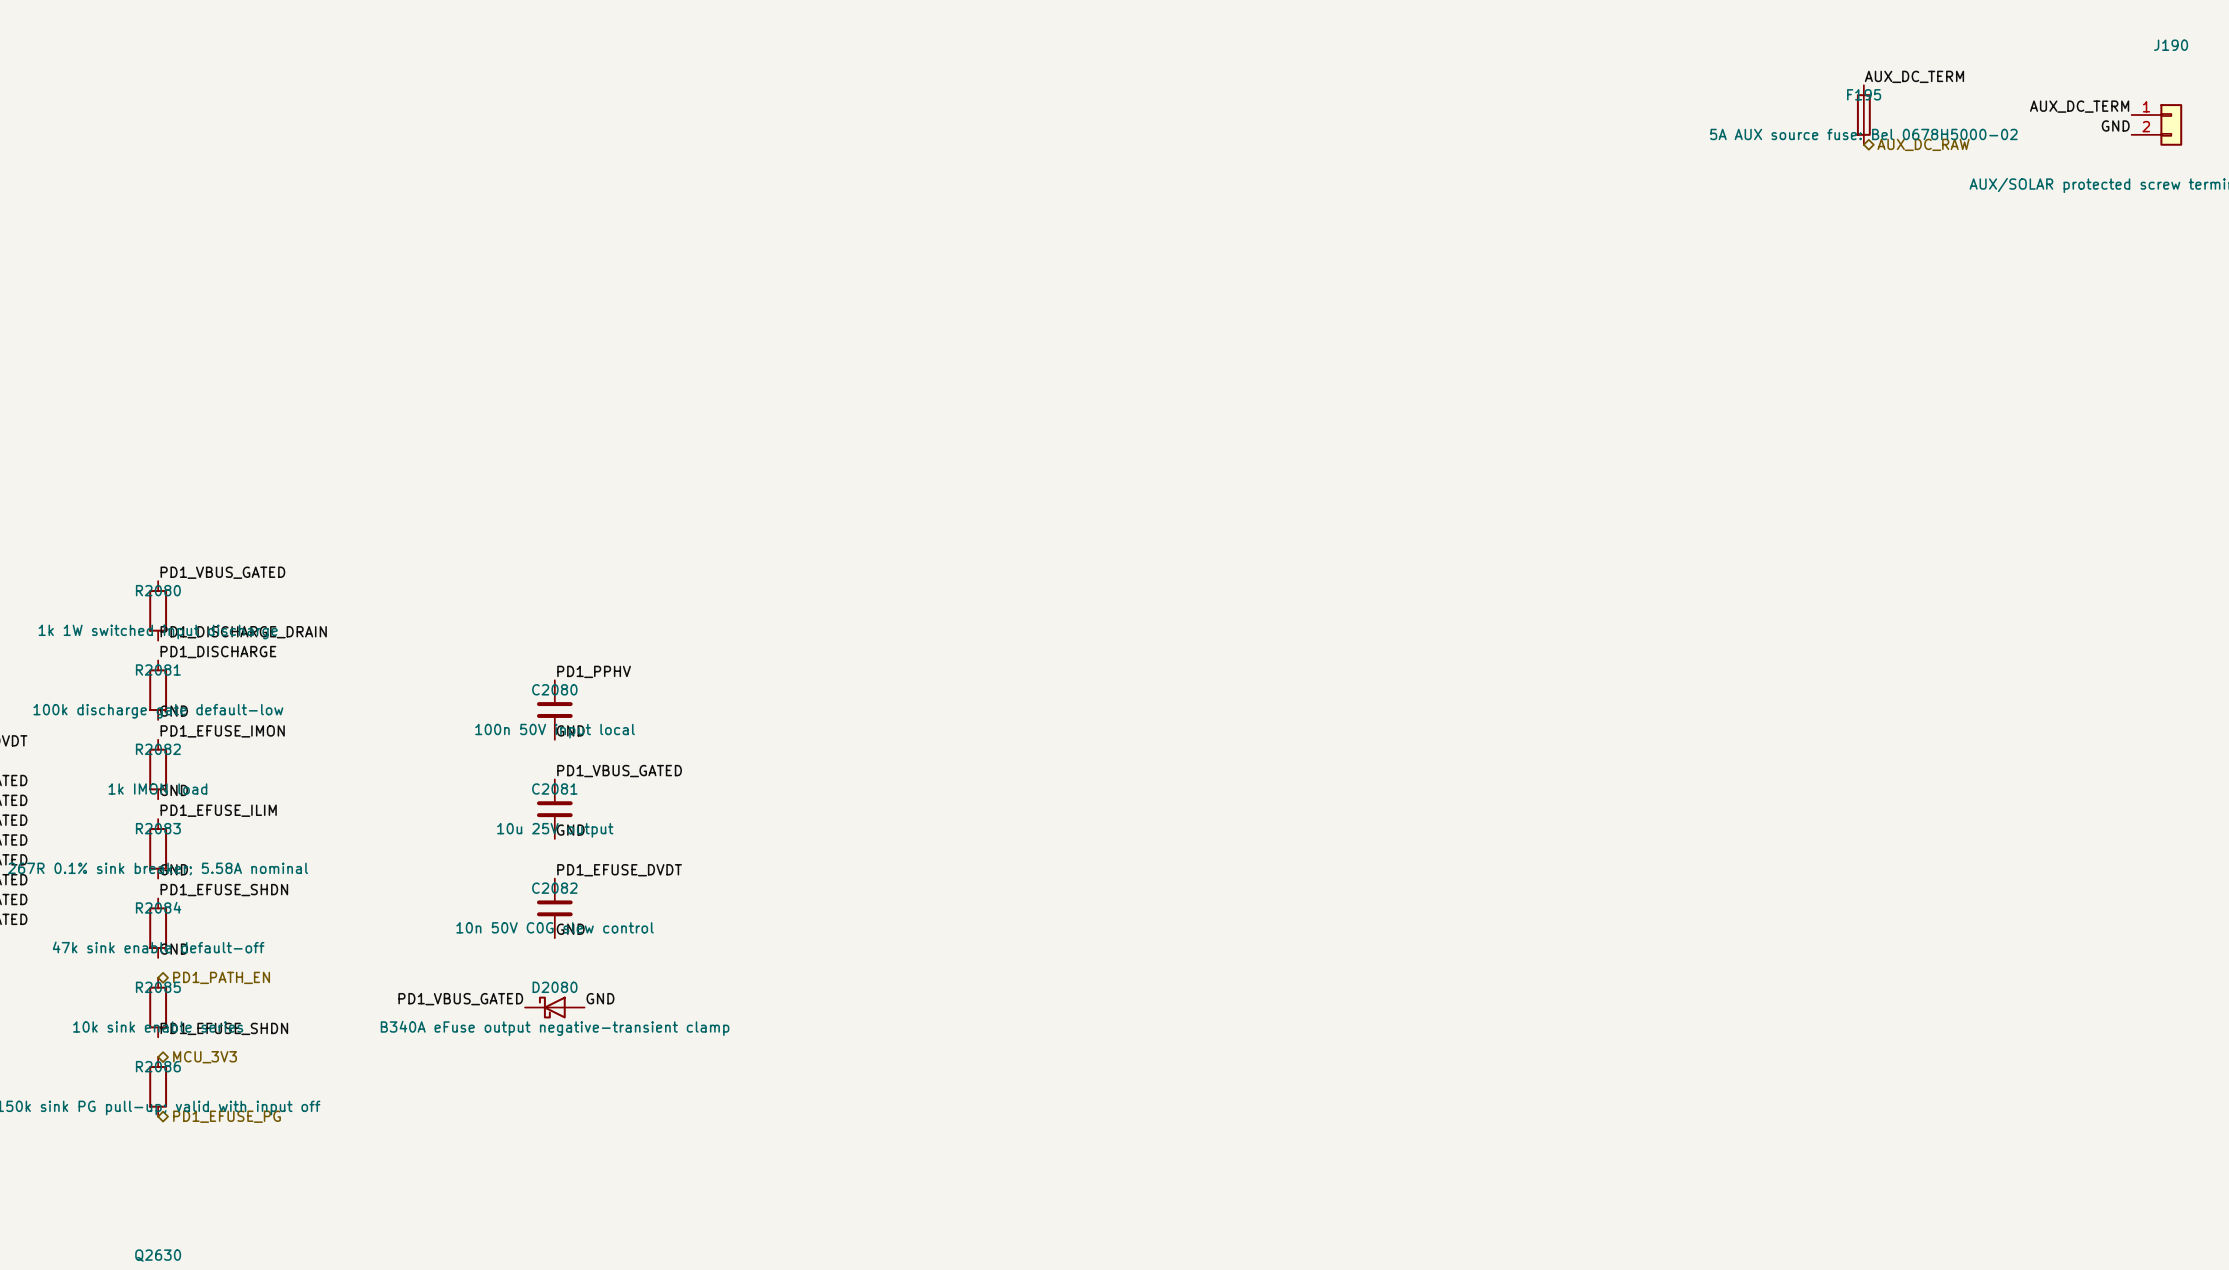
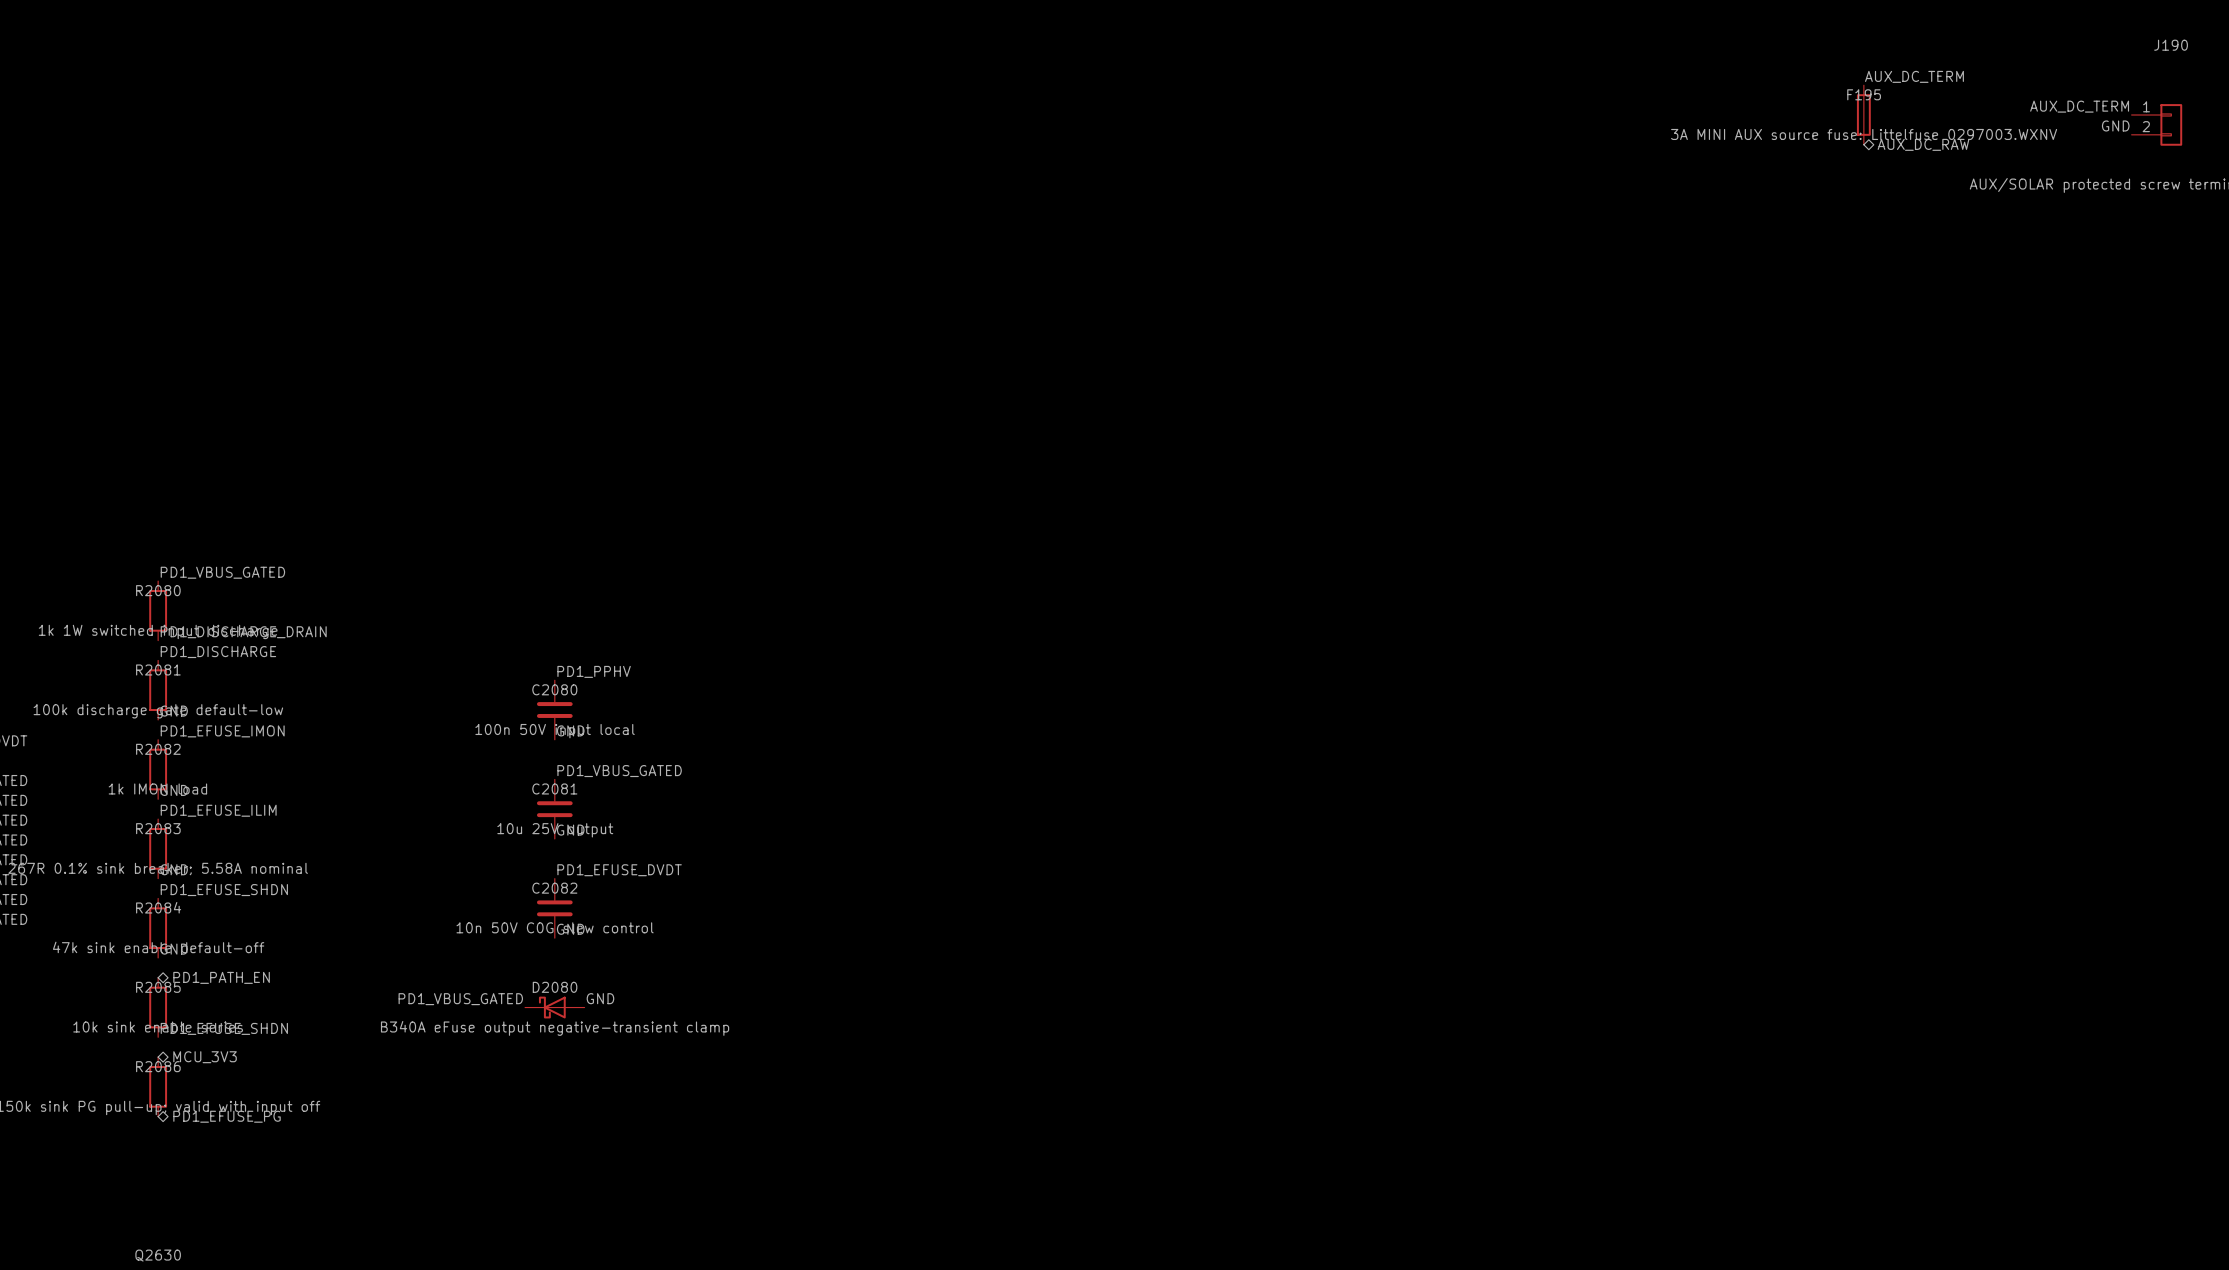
F195 value: 5A AUX source fuse: Bel 0678H5000-02 (1863, 134) -> 3A MINI AUX source fuse: Littelfuse 0297003.WXNV (1864, 134)

